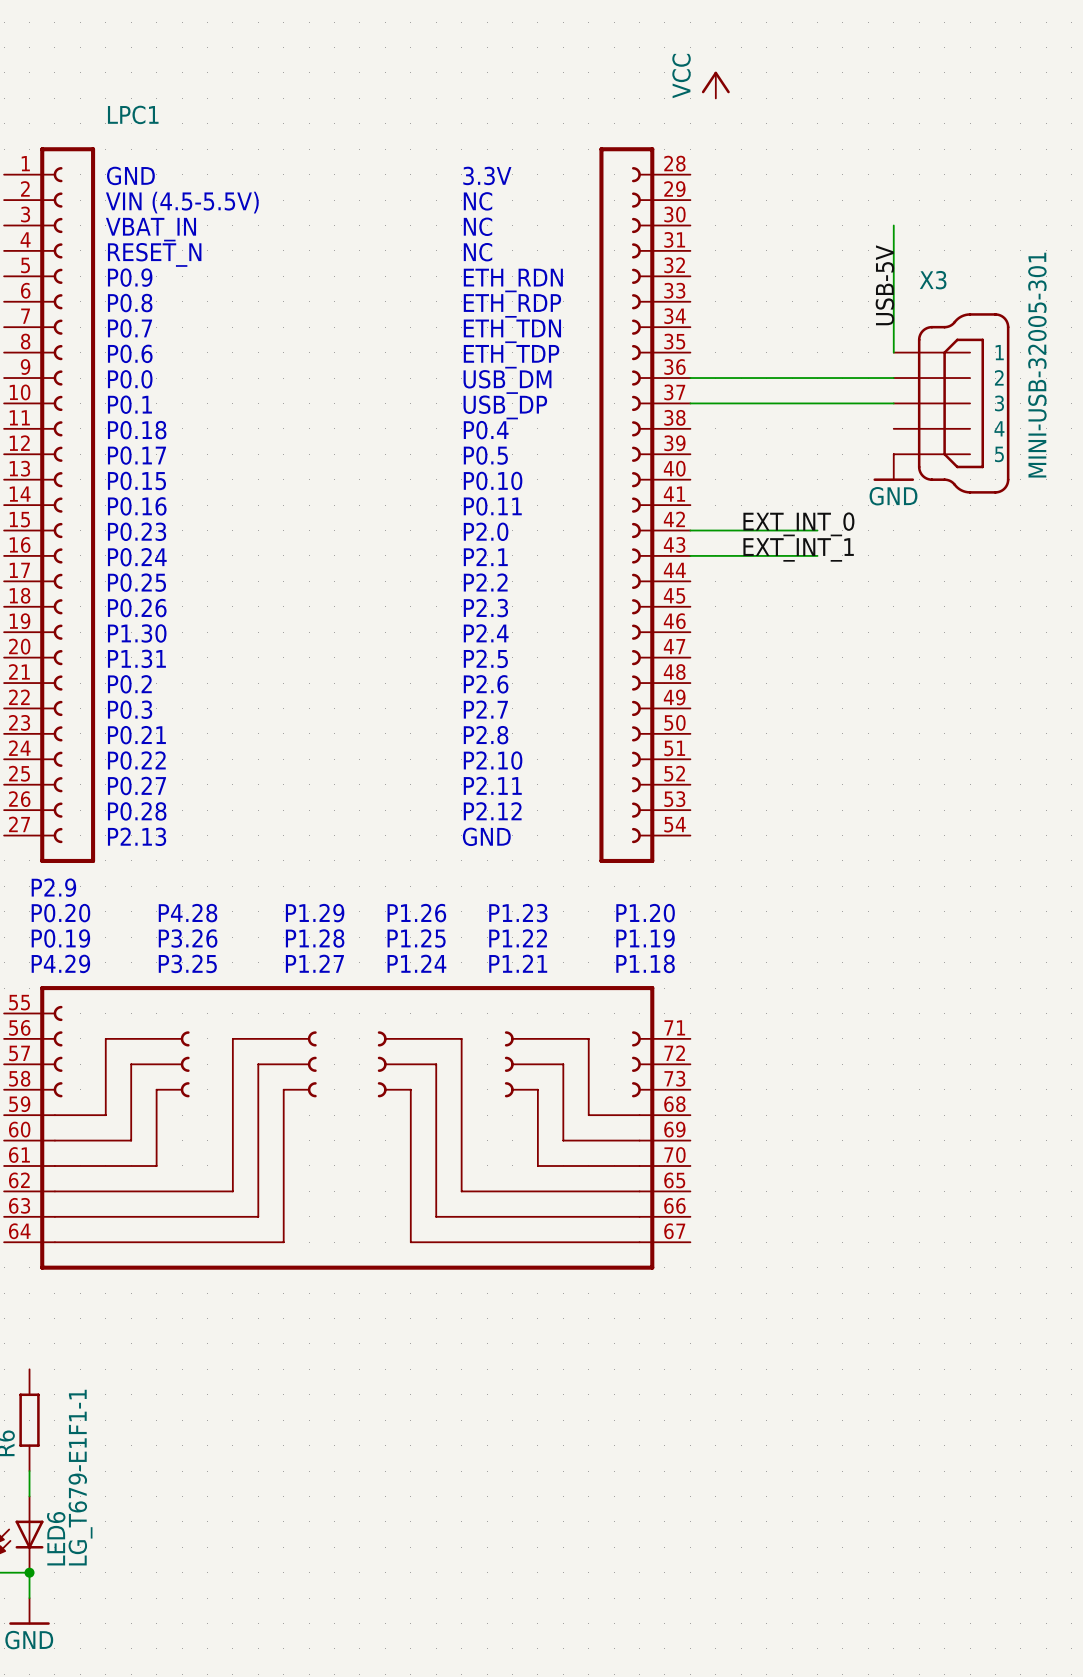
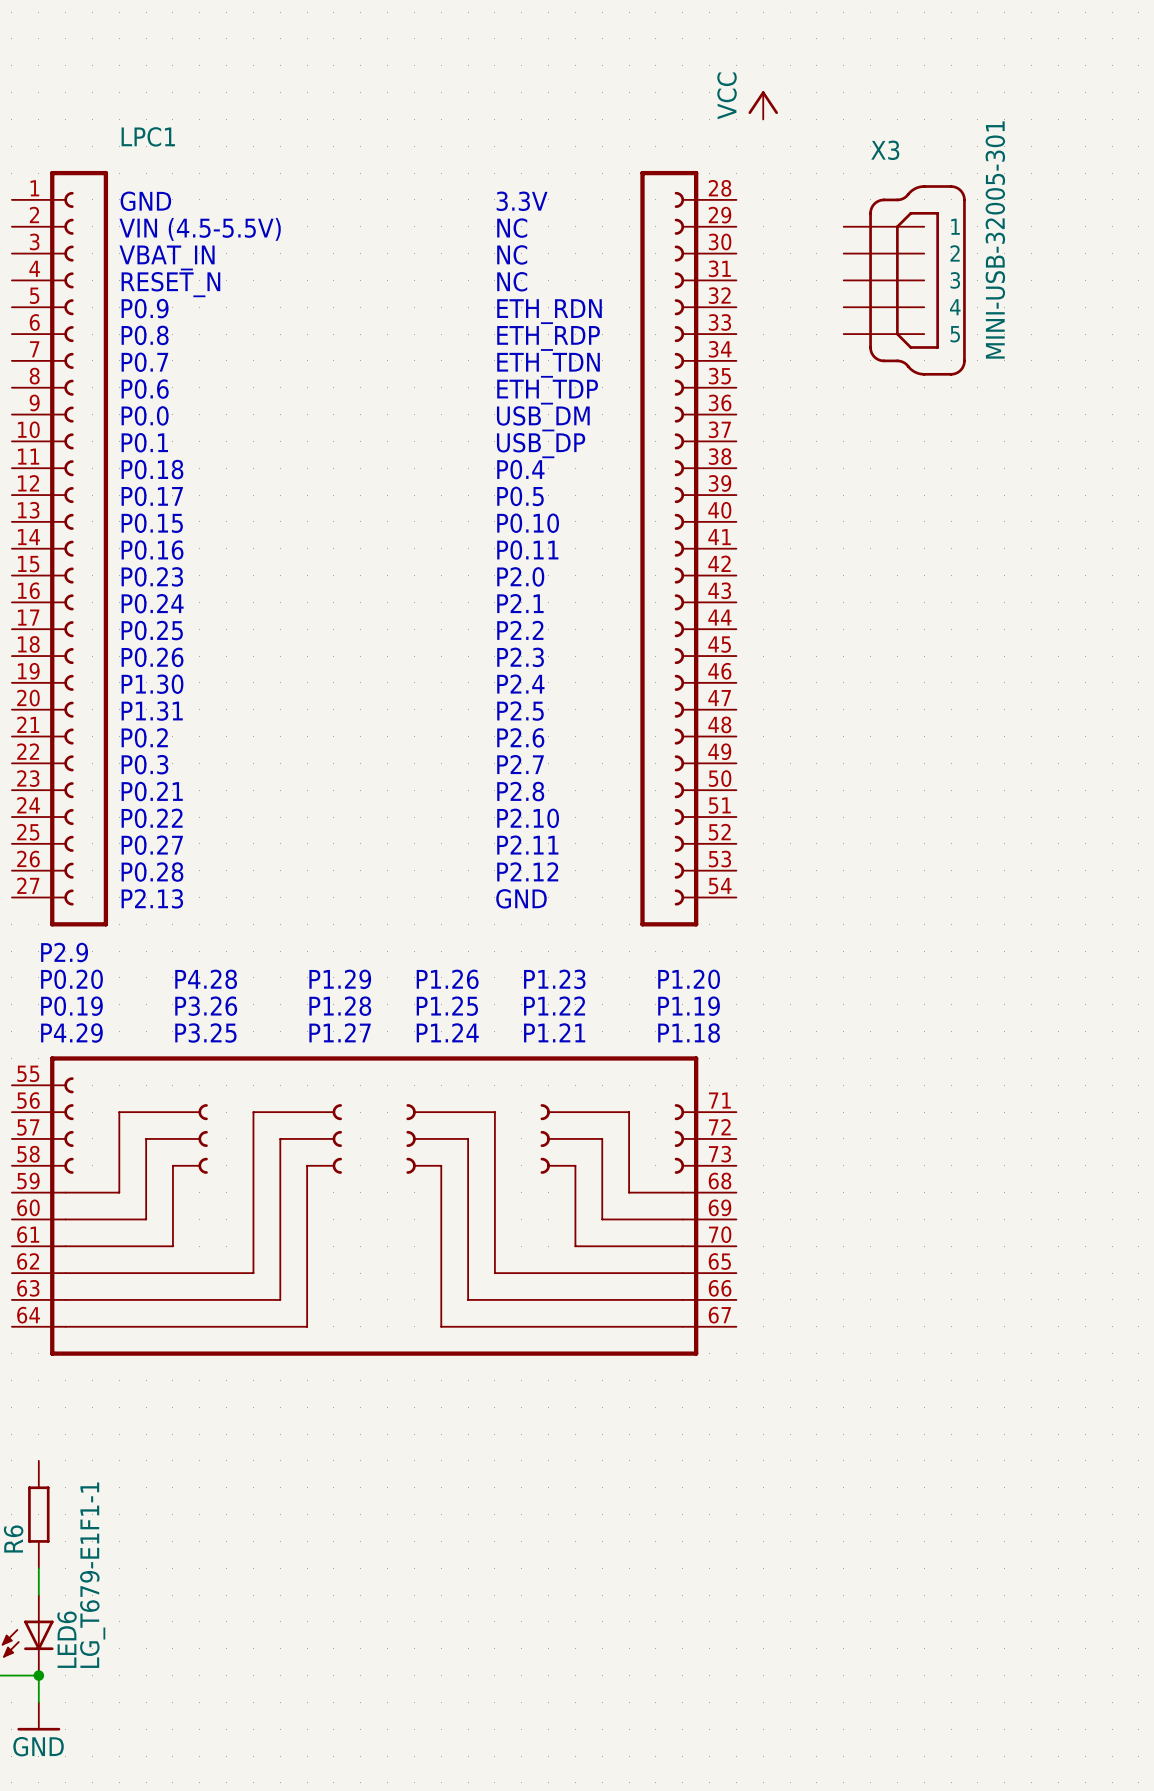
wire: (893, 225) (893, 352) -> none
label: USB-5V (884, 285) -> none
wire: (690, 378) (893, 378) -> none
wire: (690, 403) (893, 403) -> none
X3 position: (951, 403) -> (904, 280)
power symbol: GND (893, 467) -> none
label: EXT_INT_0 (798, 524) -> none
wire: (690, 530) (817, 530) -> none
label: EXT_INT_1 (798, 549) -> none
wire: (690, 555) (817, 555) -> none

